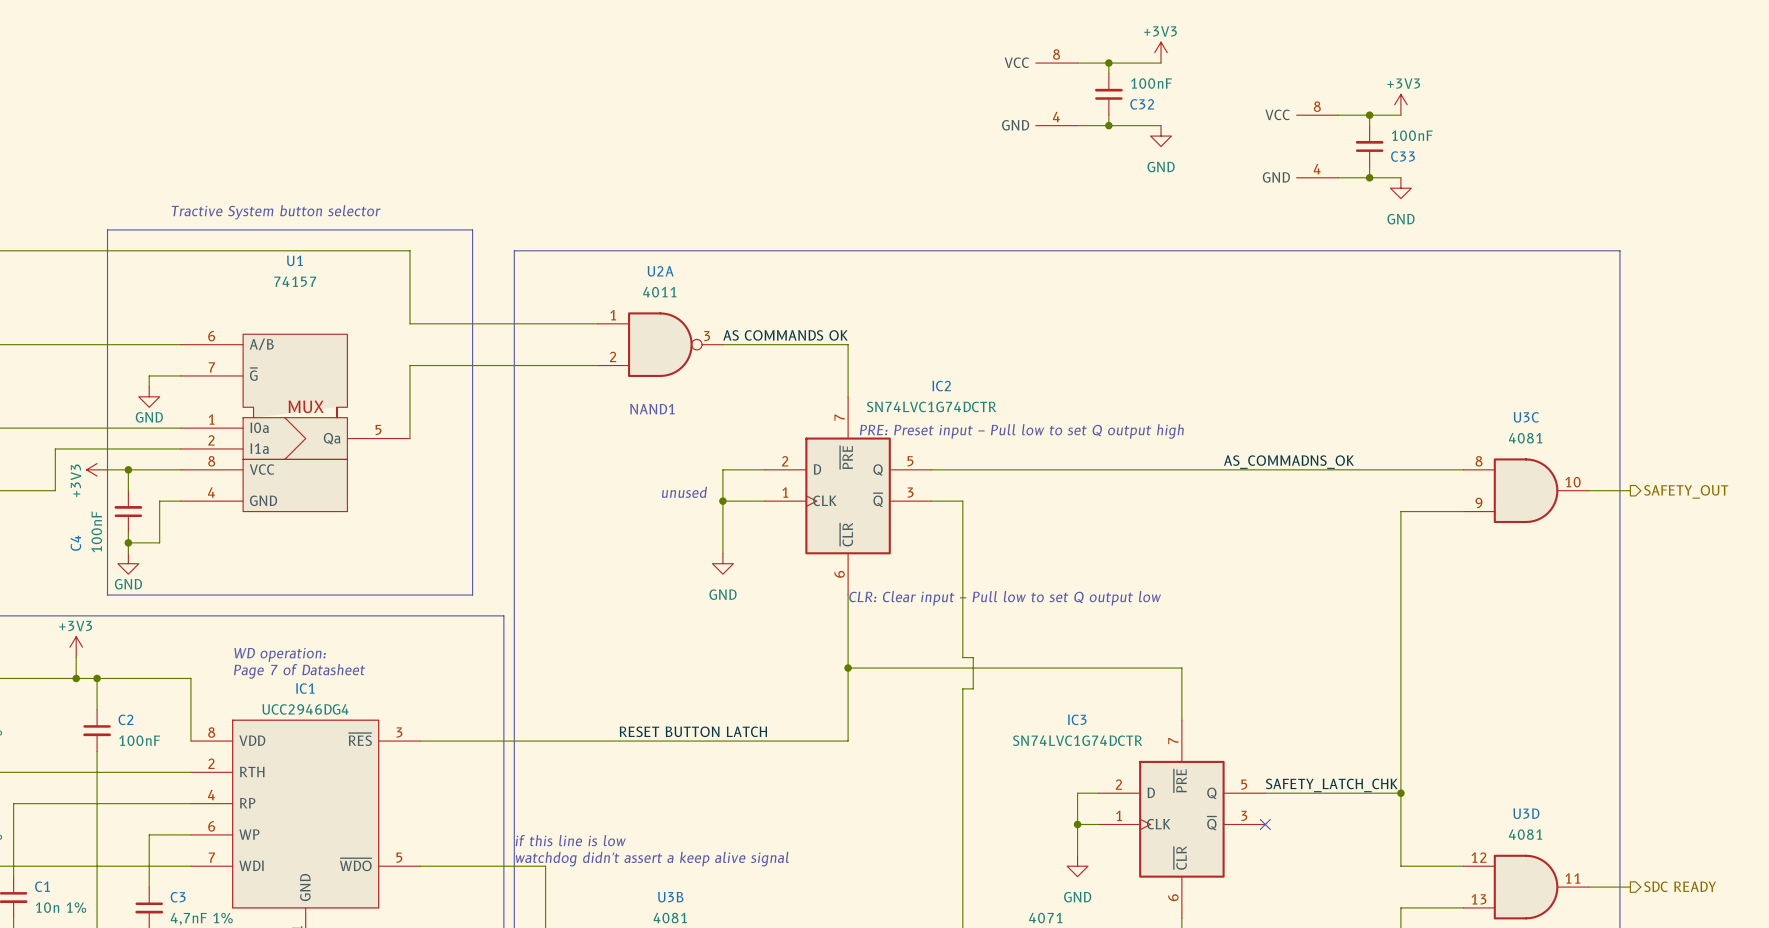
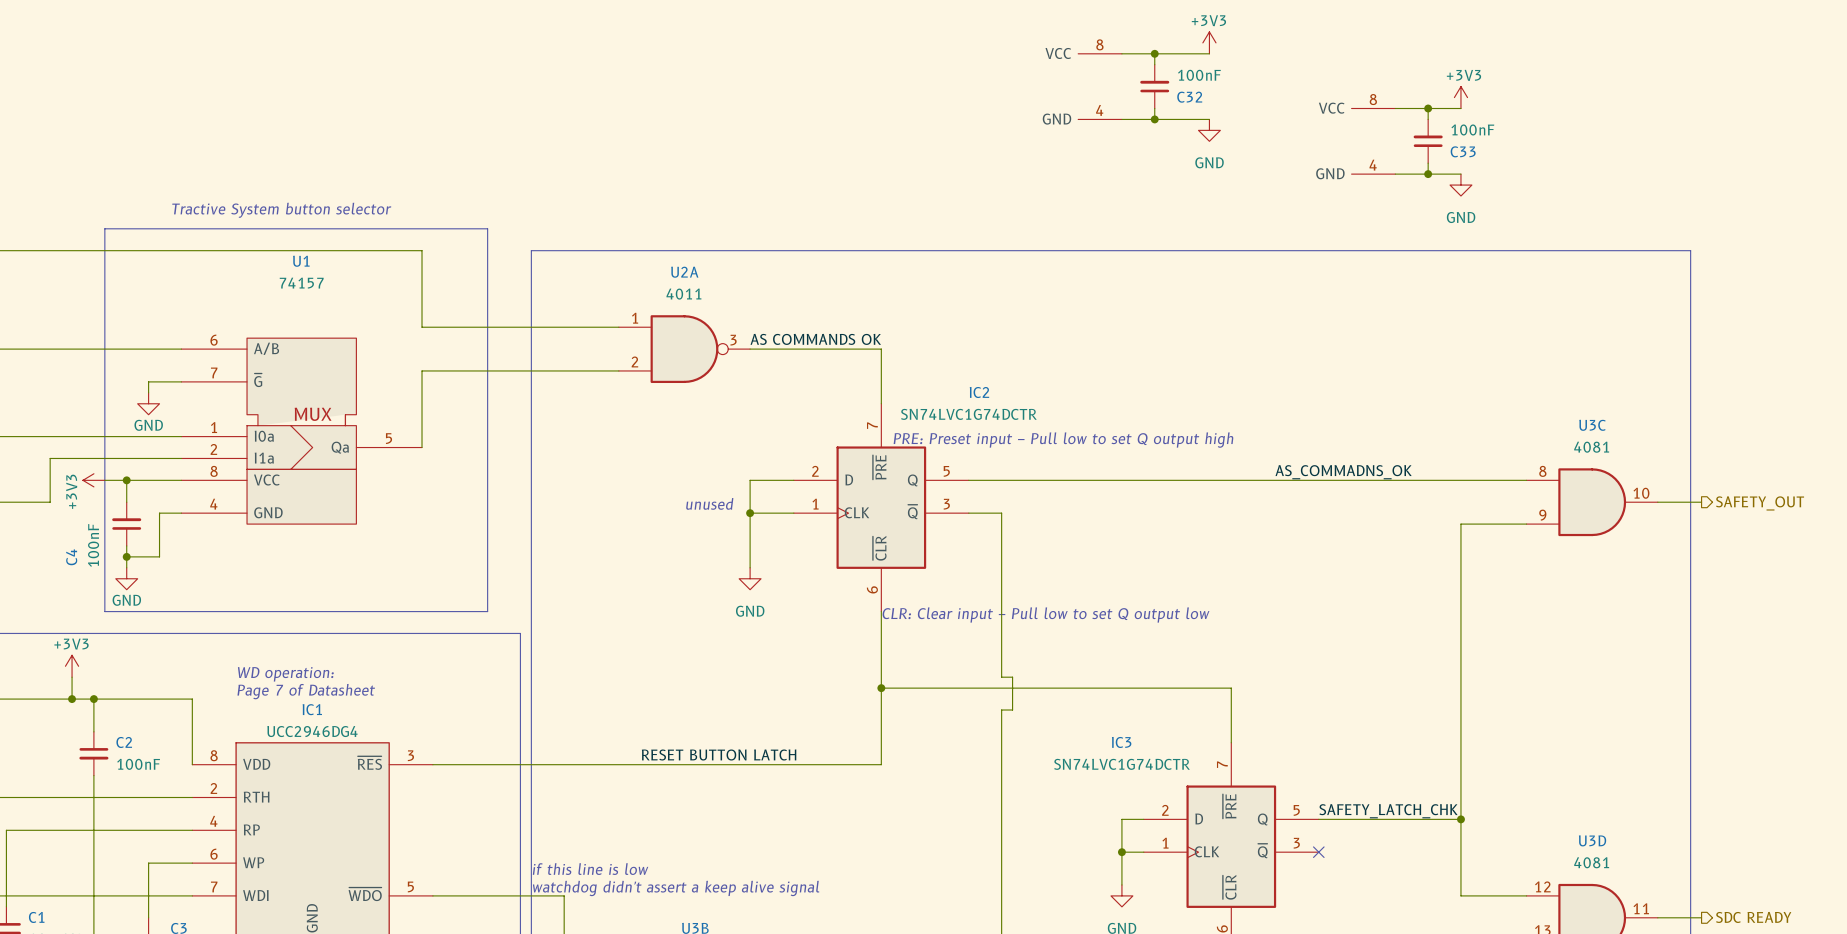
text: NAND1 (652, 409) -> none

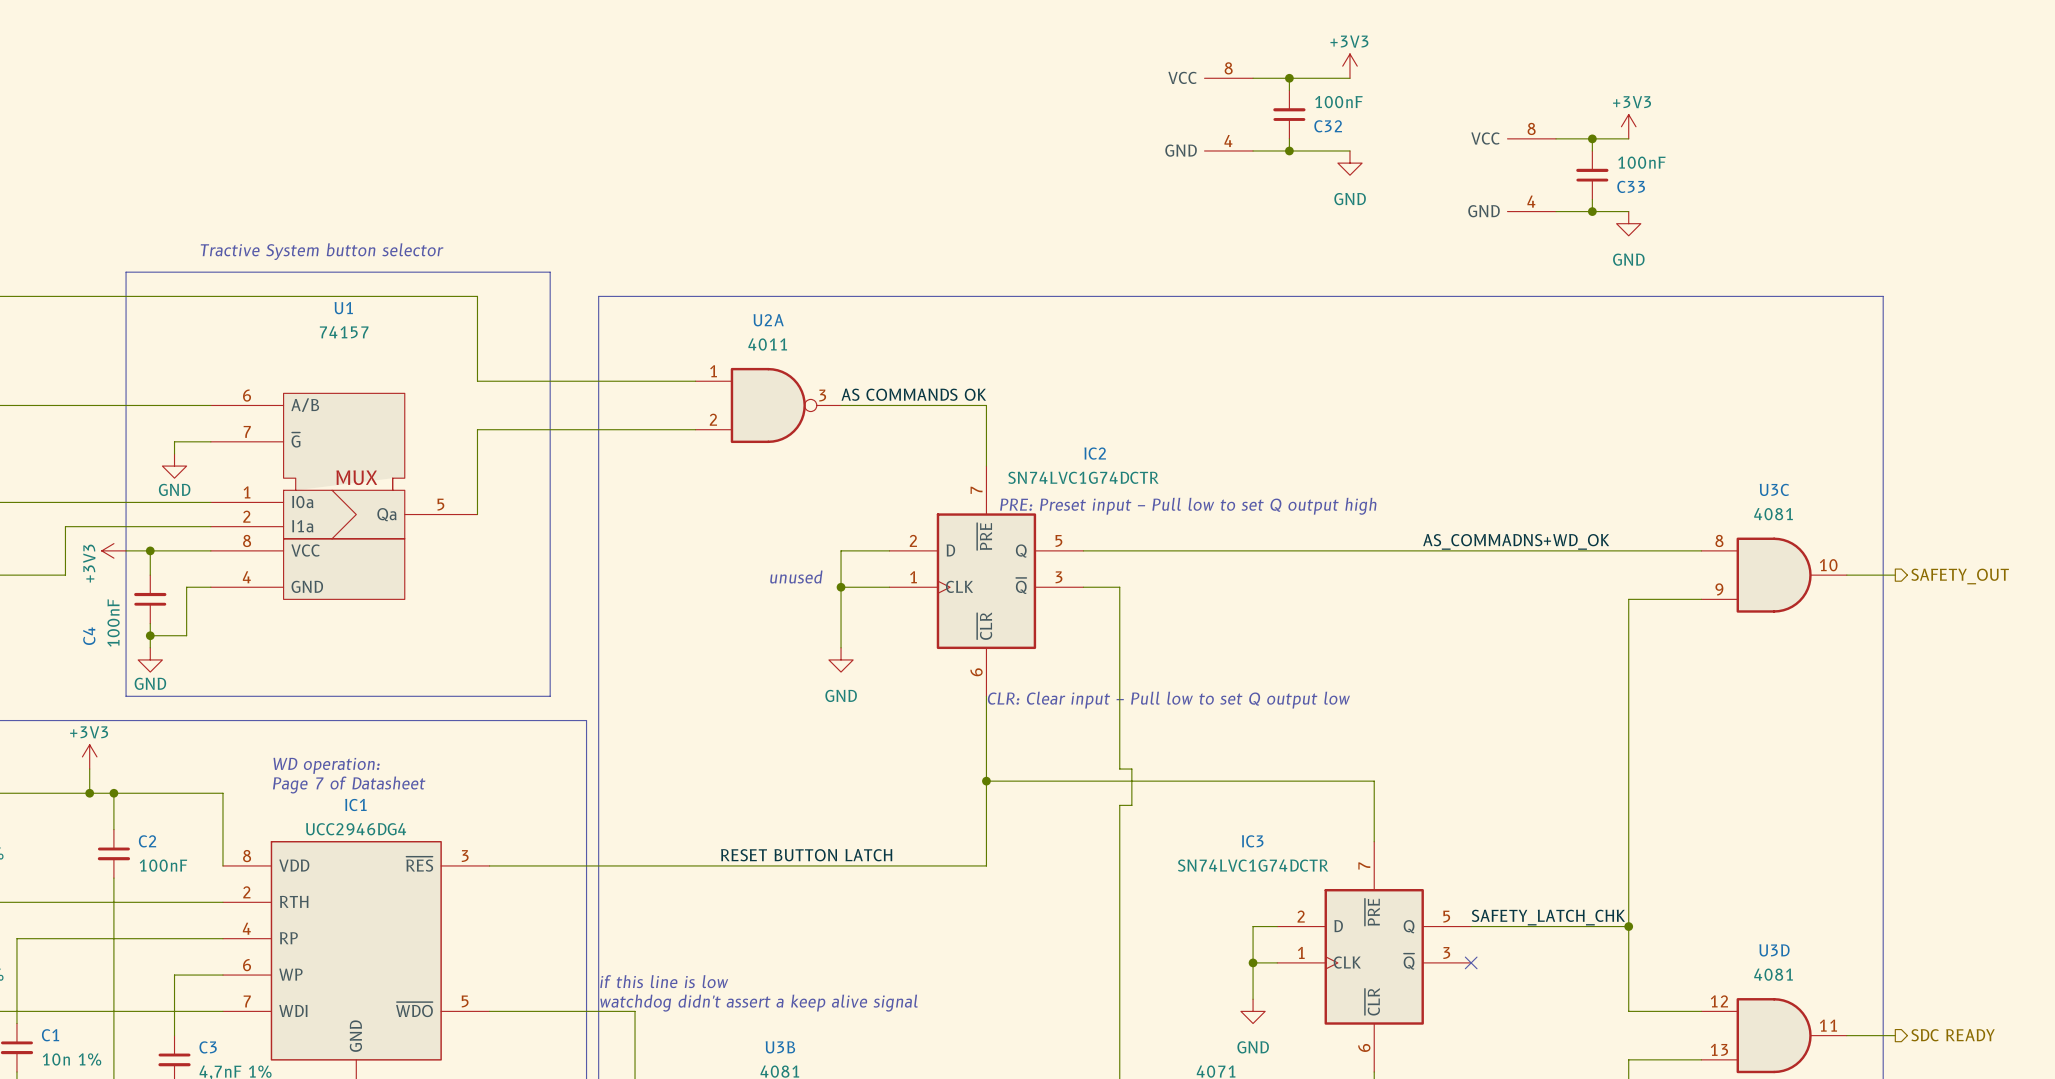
label: AS_COMMADNS_OK (1343, 472) -> AS_COMMADNS+WD_OK (1516, 541)

